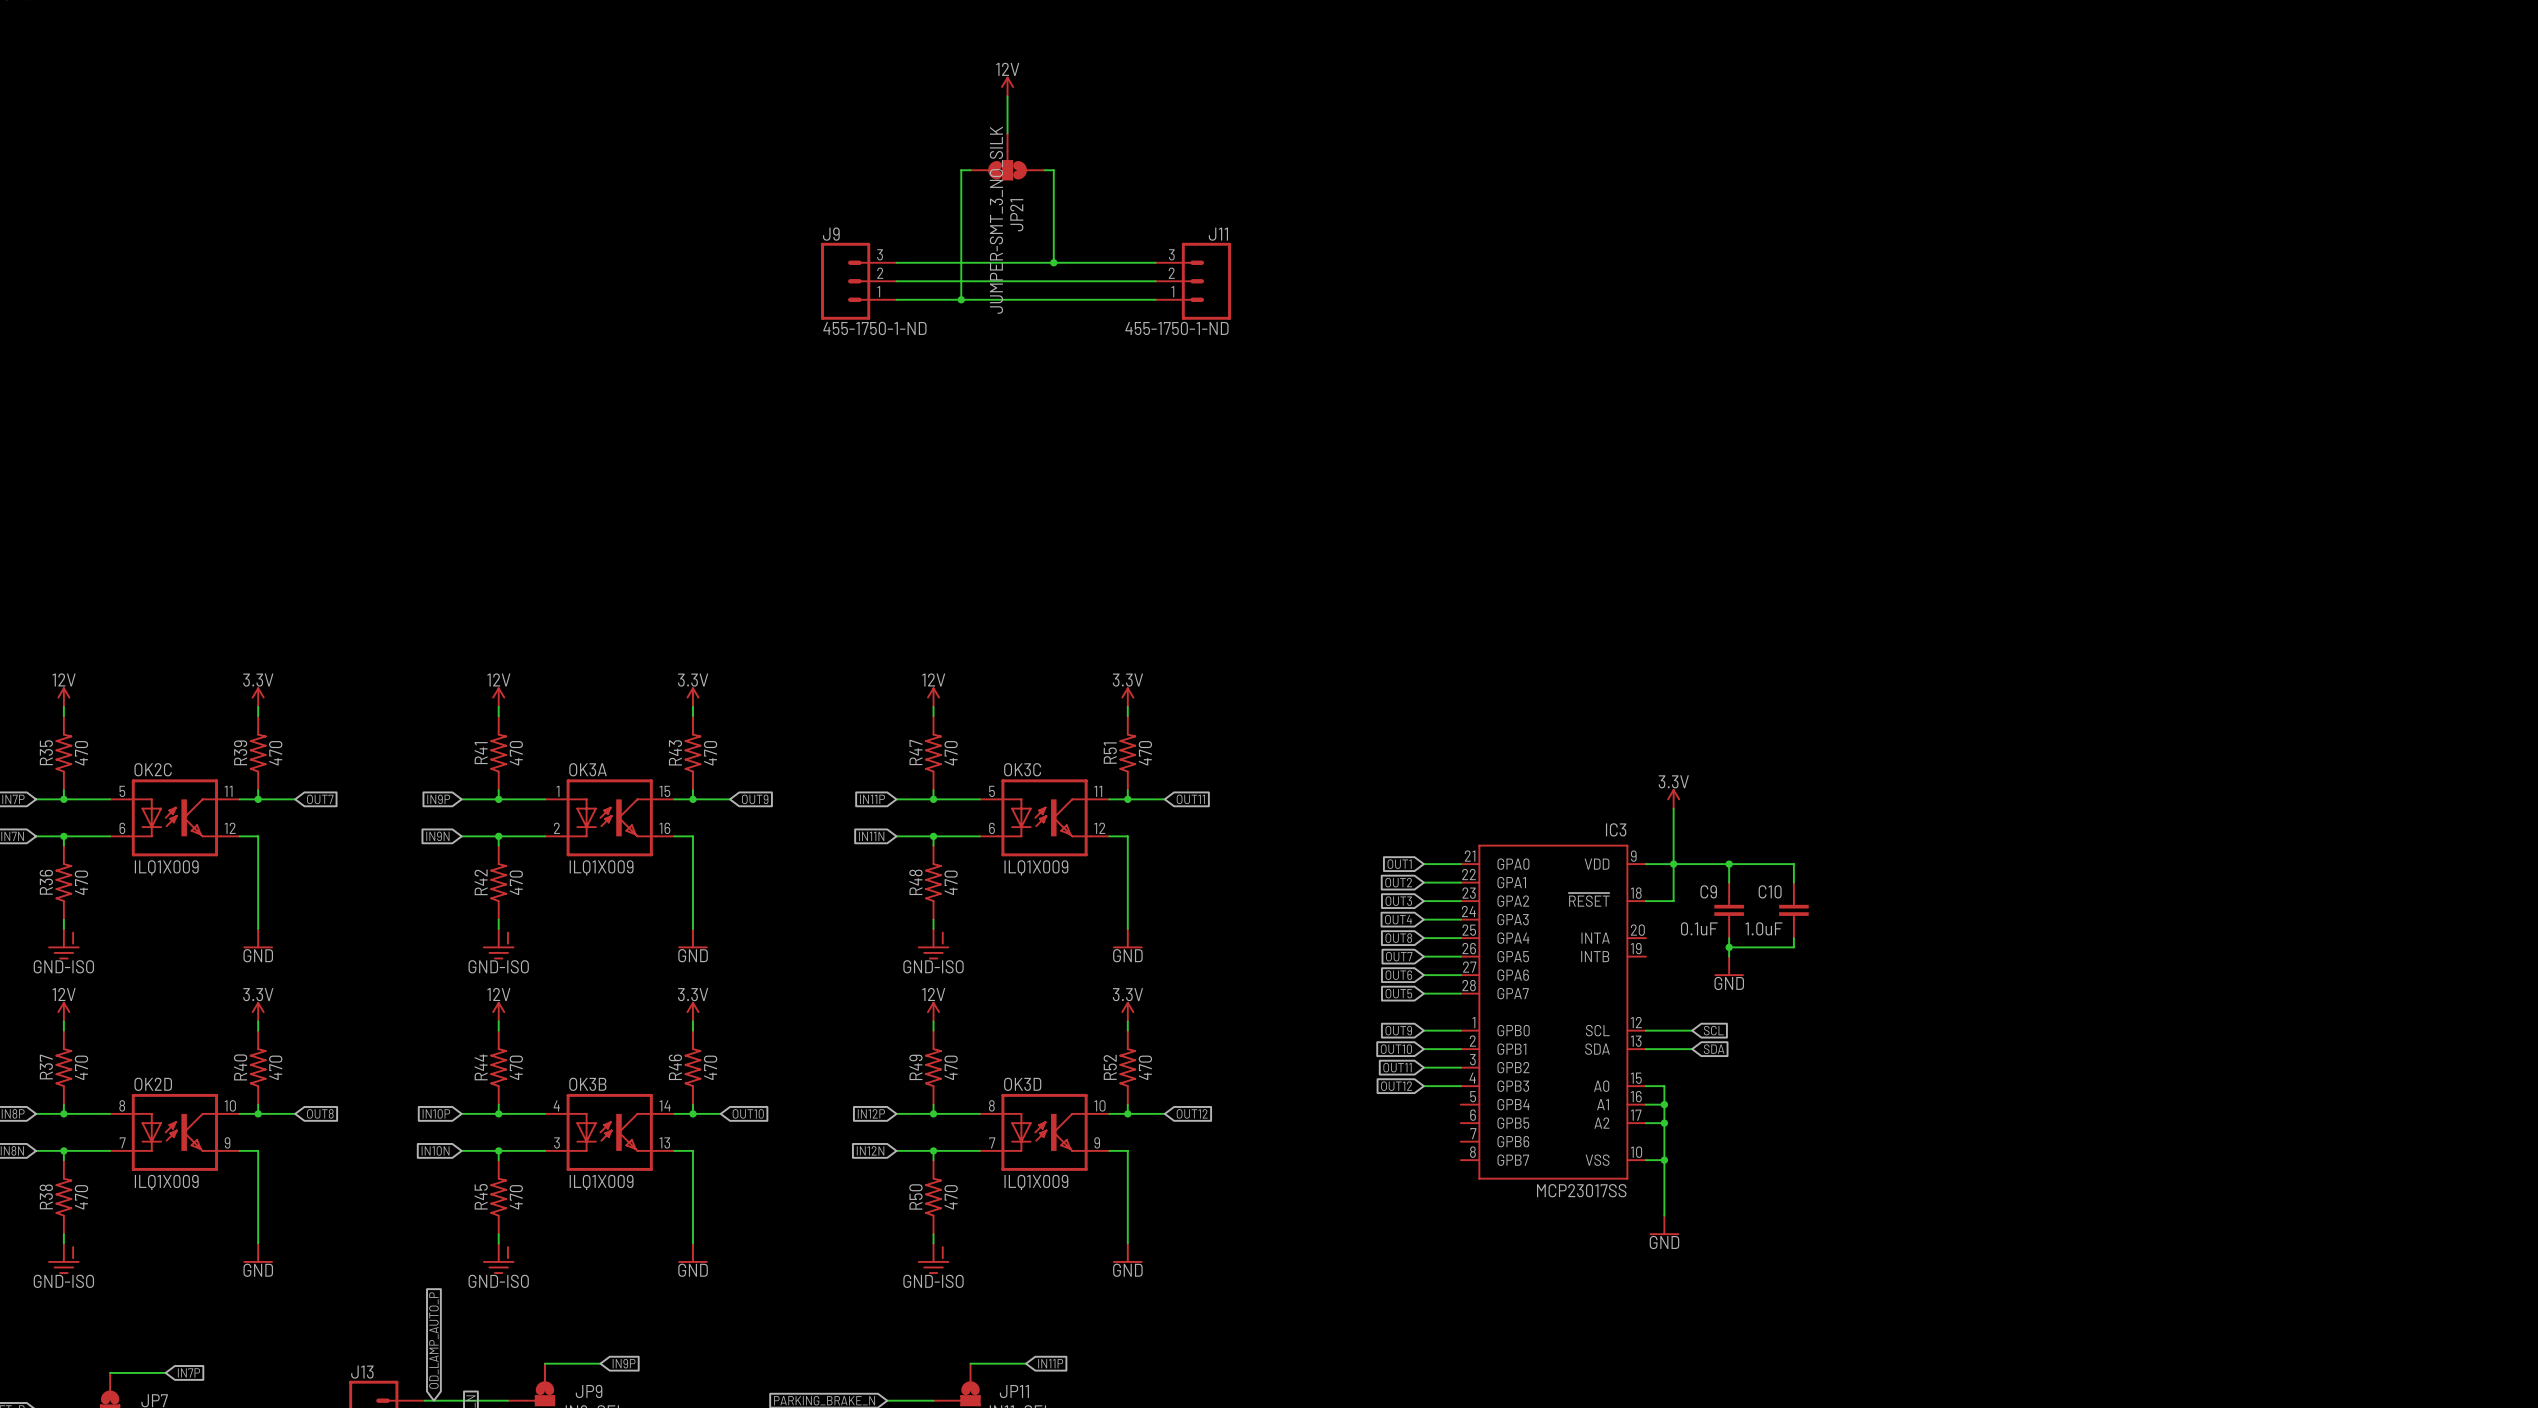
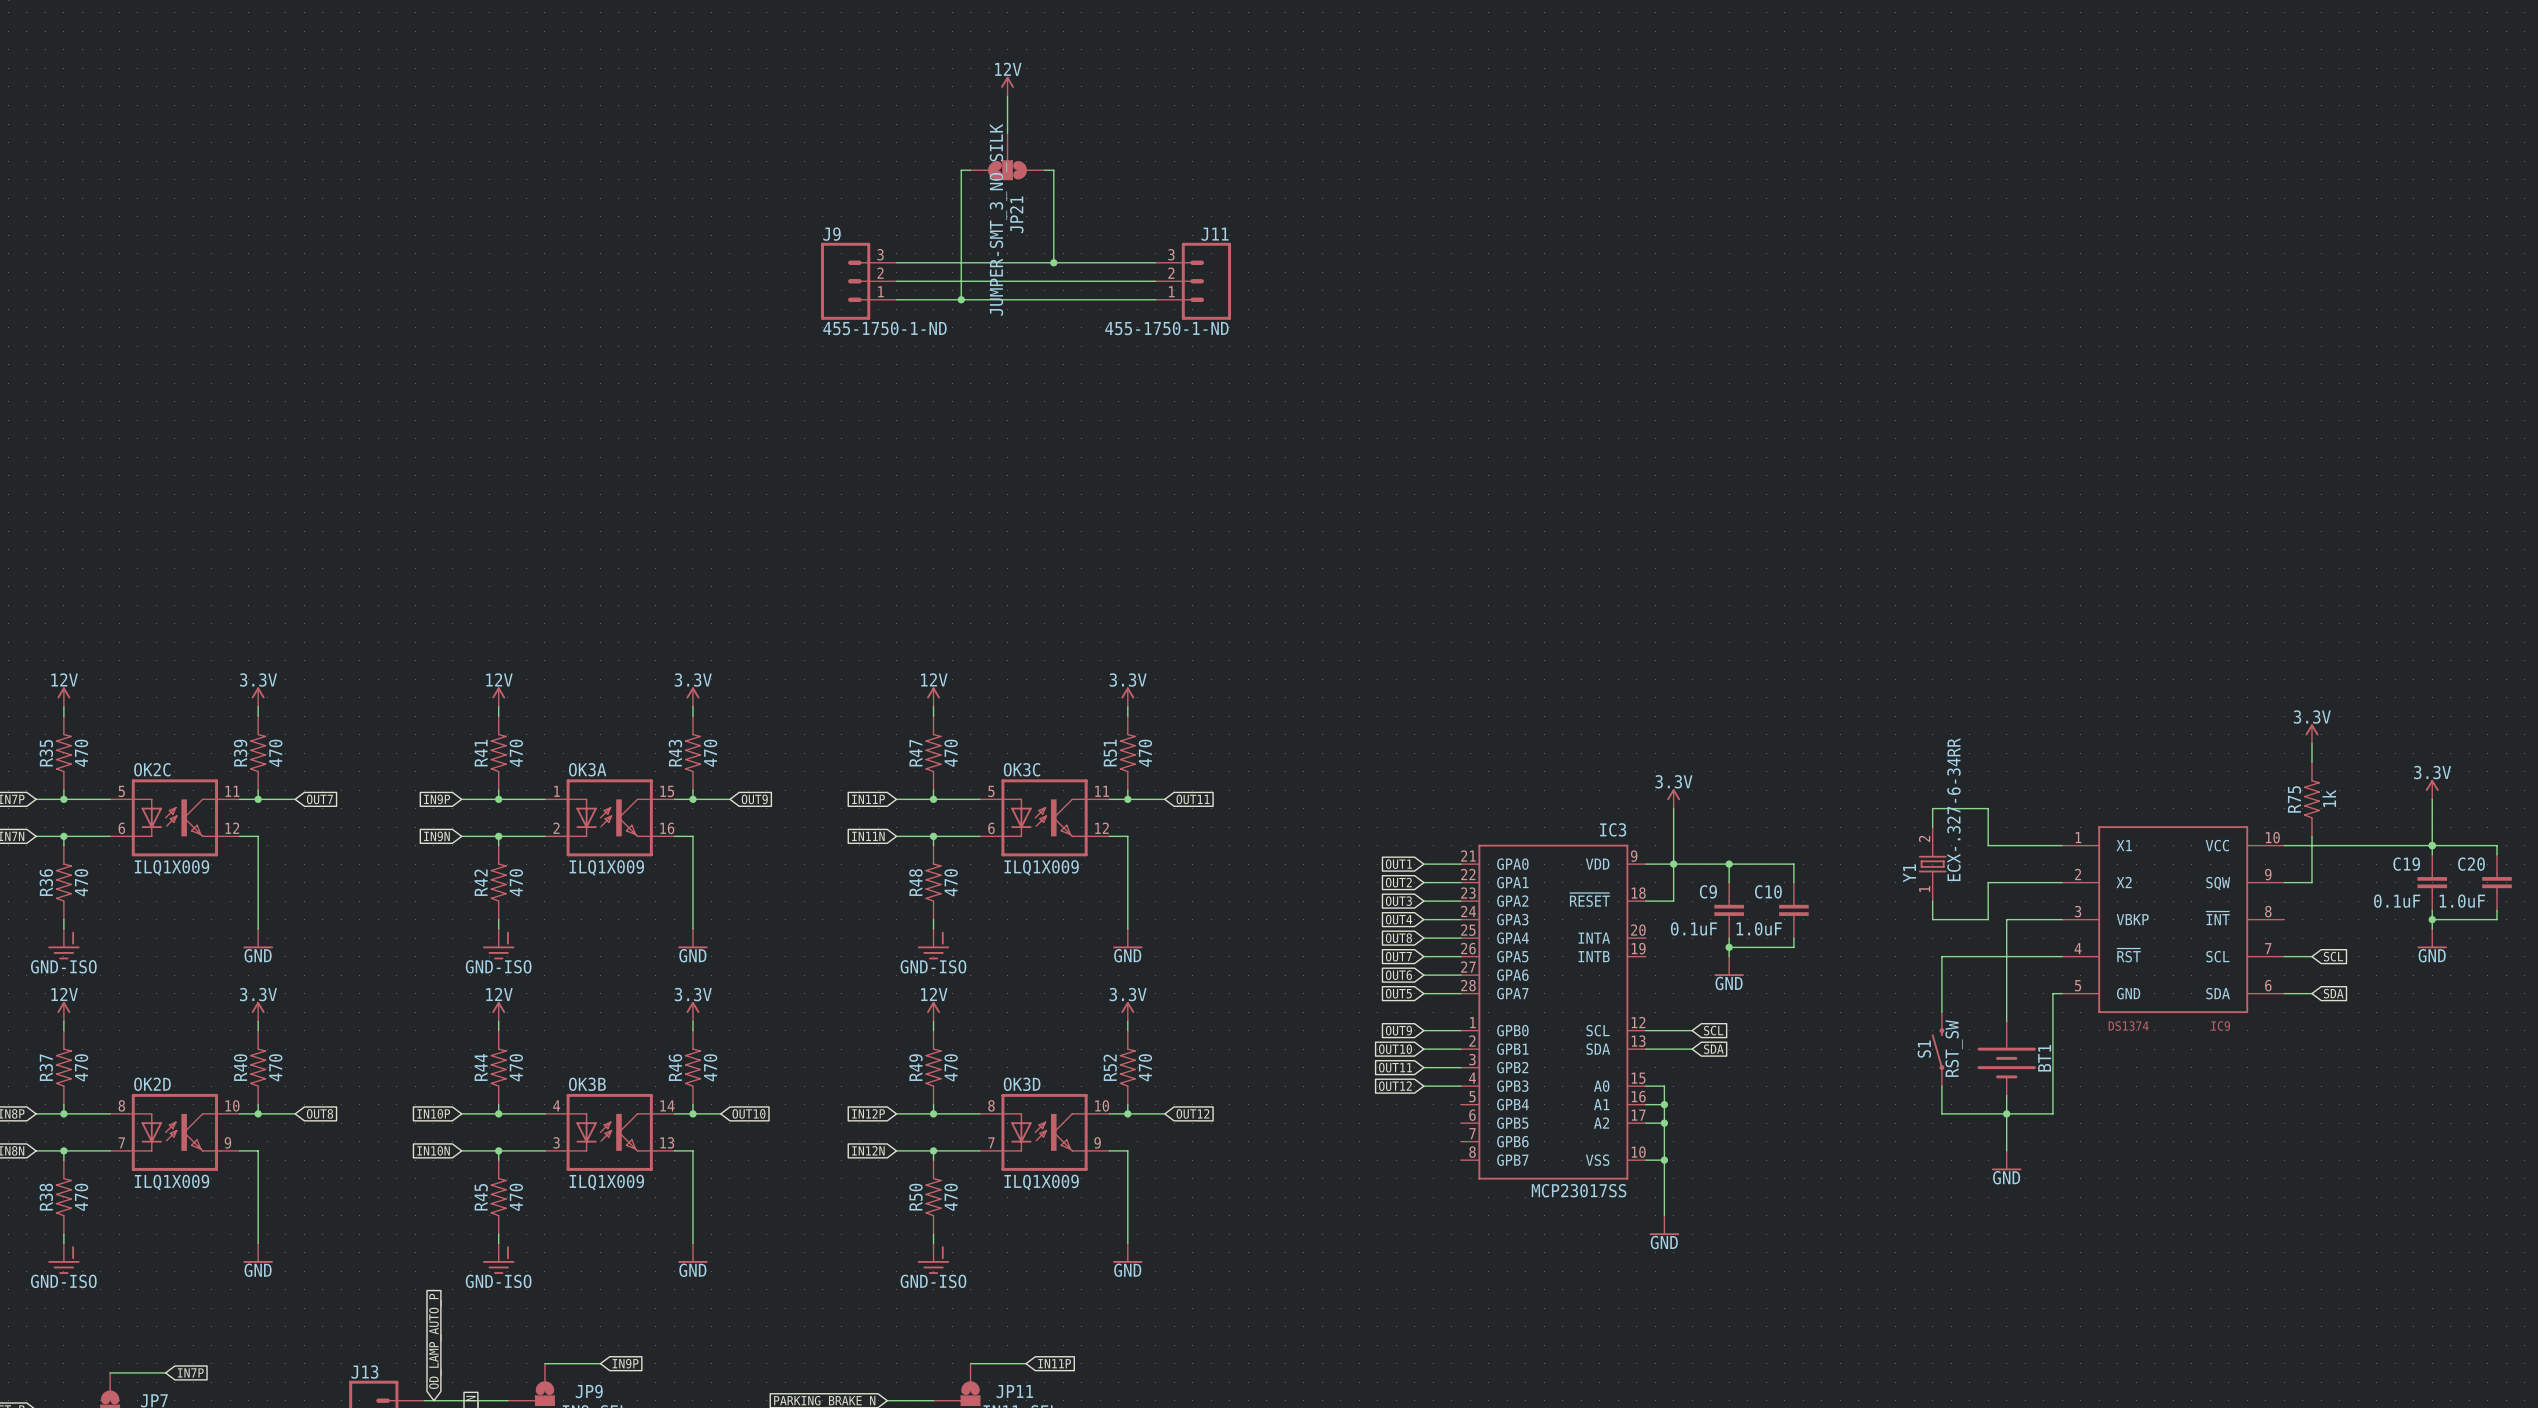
power symbol: none -> 3.3V (2311, 734)
wire: none -> (2311, 743) (2311, 762)
power symbol: none -> 3.3V (2432, 789)
R75: none -> 1k (2311, 799)
wire: none -> (2432, 799) (2432, 854)
wire: none -> (1932, 827) (1932, 808) (1988, 808) (1988, 845) (2062, 845)
wire: none -> (2311, 836) (2311, 882) (2284, 882)
wire: none -> (2284, 845) (2497, 845) (2497, 854)
junction: none -> (2432, 845)
Y1: none -> ECX-.327-6-34RR (1932, 864)
wire: none -> (2062, 882) (1988, 882) (1988, 919) (1932, 919) (1932, 901)
C19: none -> 0.1uF (2432, 882)
C20: none -> 1.0uF (2497, 882)
wire: none -> (2432, 910) (2432, 928)
wire: none -> (2497, 910) (2497, 919) (2432, 919)
wire: none -> (2062, 919) (2006, 919) (2006, 1021)
IC9: none -> DS1374 (2173, 919)
junction: none -> (2432, 919)
power symbol: none -> GND (2432, 938)
wire: none -> (2062, 956) (1941, 956) (1941, 1012)
wire: none -> (2284, 956) (2311, 956)
global label: none -> SCL (2333, 956)
wire: none -> (2062, 993) (2052, 993) (2052, 1113) (1941, 1113) (1941, 1086)
wire: none -> (2284, 993) (2311, 993)
global label: none -> SDA (2333, 993)
S1: none -> RST_SW (1938, 1049)
BT1: none -> (2006, 1058)
wire: none -> (2006, 1095) (2006, 1150)
junction: none -> (2006, 1113)
power symbol: none -> GND (2006, 1160)

